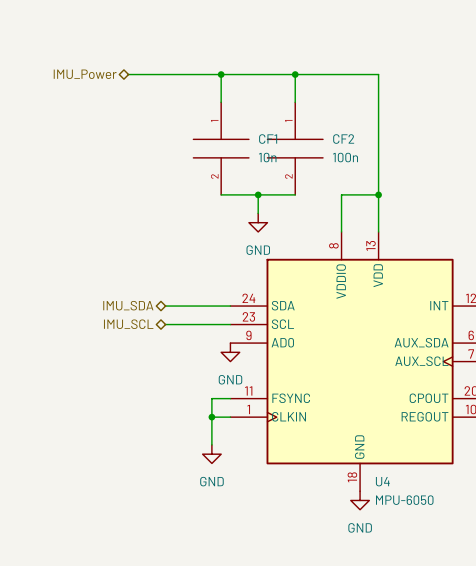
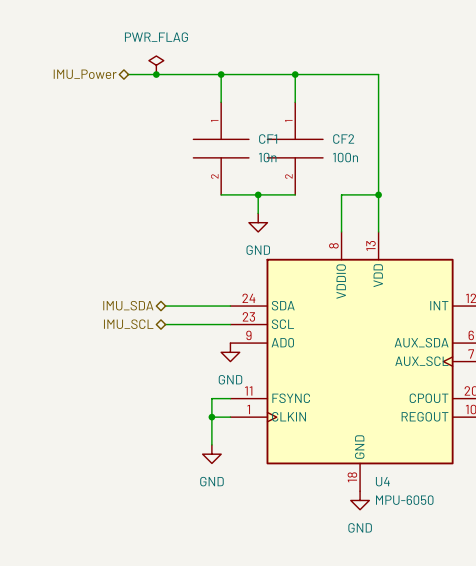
power symbol: none -> PWR_FLAG (156, 65)
junction: none -> (156, 74)

